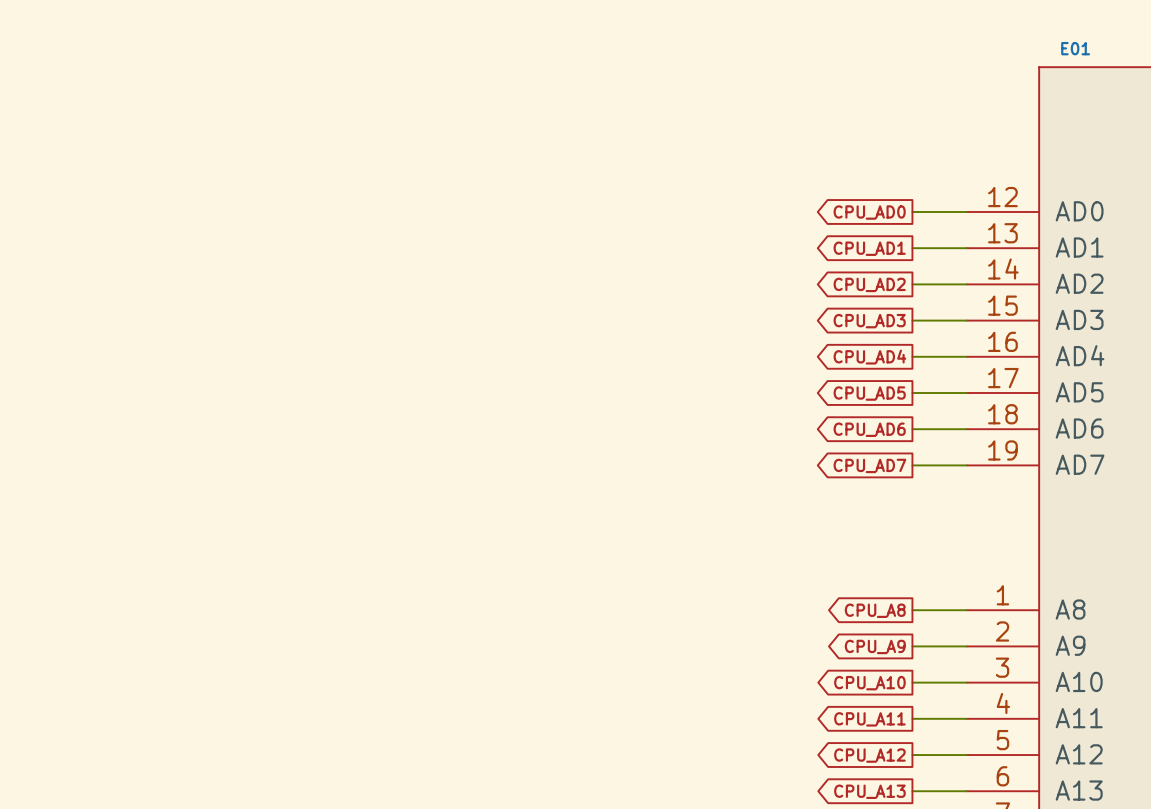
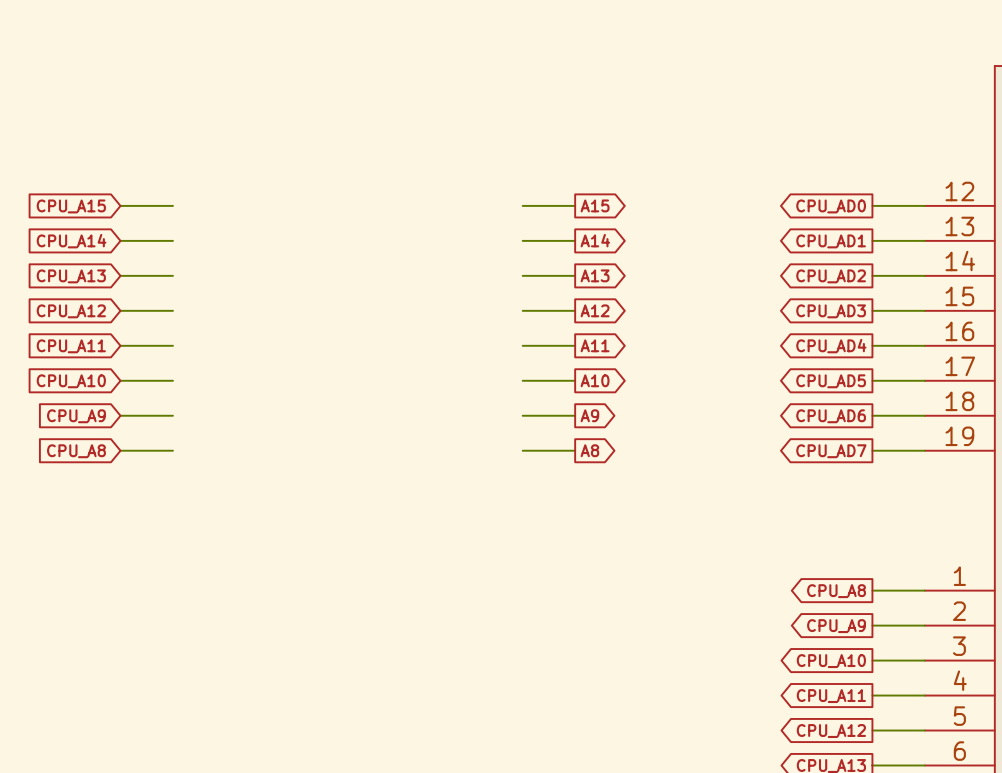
wire: none -> (120, 205) (172, 205)
wire: none -> (522, 205) (575, 205)
global label: none -> A15 (595, 205)
global label: none -> CPU_A15 (71, 206)
global label: none -> A14 (595, 240)
global label: none -> CPU_A14 (71, 241)
wire: none -> (120, 240) (172, 240)
wire: none -> (522, 240) (575, 240)
global label: none -> CPU_A13 (71, 276)
wire: none -> (120, 275) (172, 275)
wire: none -> (522, 275) (575, 275)
global label: none -> A13 (595, 275)
wire: none -> (120, 310) (172, 310)
wire: none -> (522, 310) (575, 310)
global label: none -> A12 (595, 310)
global label: none -> CPU_A12 (71, 311)
wire: none -> (120, 345) (172, 345)
wire: none -> (522, 345) (575, 345)
global label: none -> A11 (595, 345)
global label: none -> CPU_A11 (71, 346)
global label: none -> CPU_A10 (71, 381)
wire: none -> (120, 380) (172, 380)
wire: none -> (522, 380) (575, 380)
global label: none -> A10 (595, 380)
global label: none -> CPU_A9 (76, 416)
wire: none -> (120, 415) (172, 415)
wire: none -> (522, 415) (575, 415)
global label: none -> A9 (589, 415)
global label: none -> CPU_A8 (76, 451)
wire: none -> (120, 450) (172, 450)
wire: none -> (522, 450) (575, 450)
global label: none -> A8 (589, 450)

